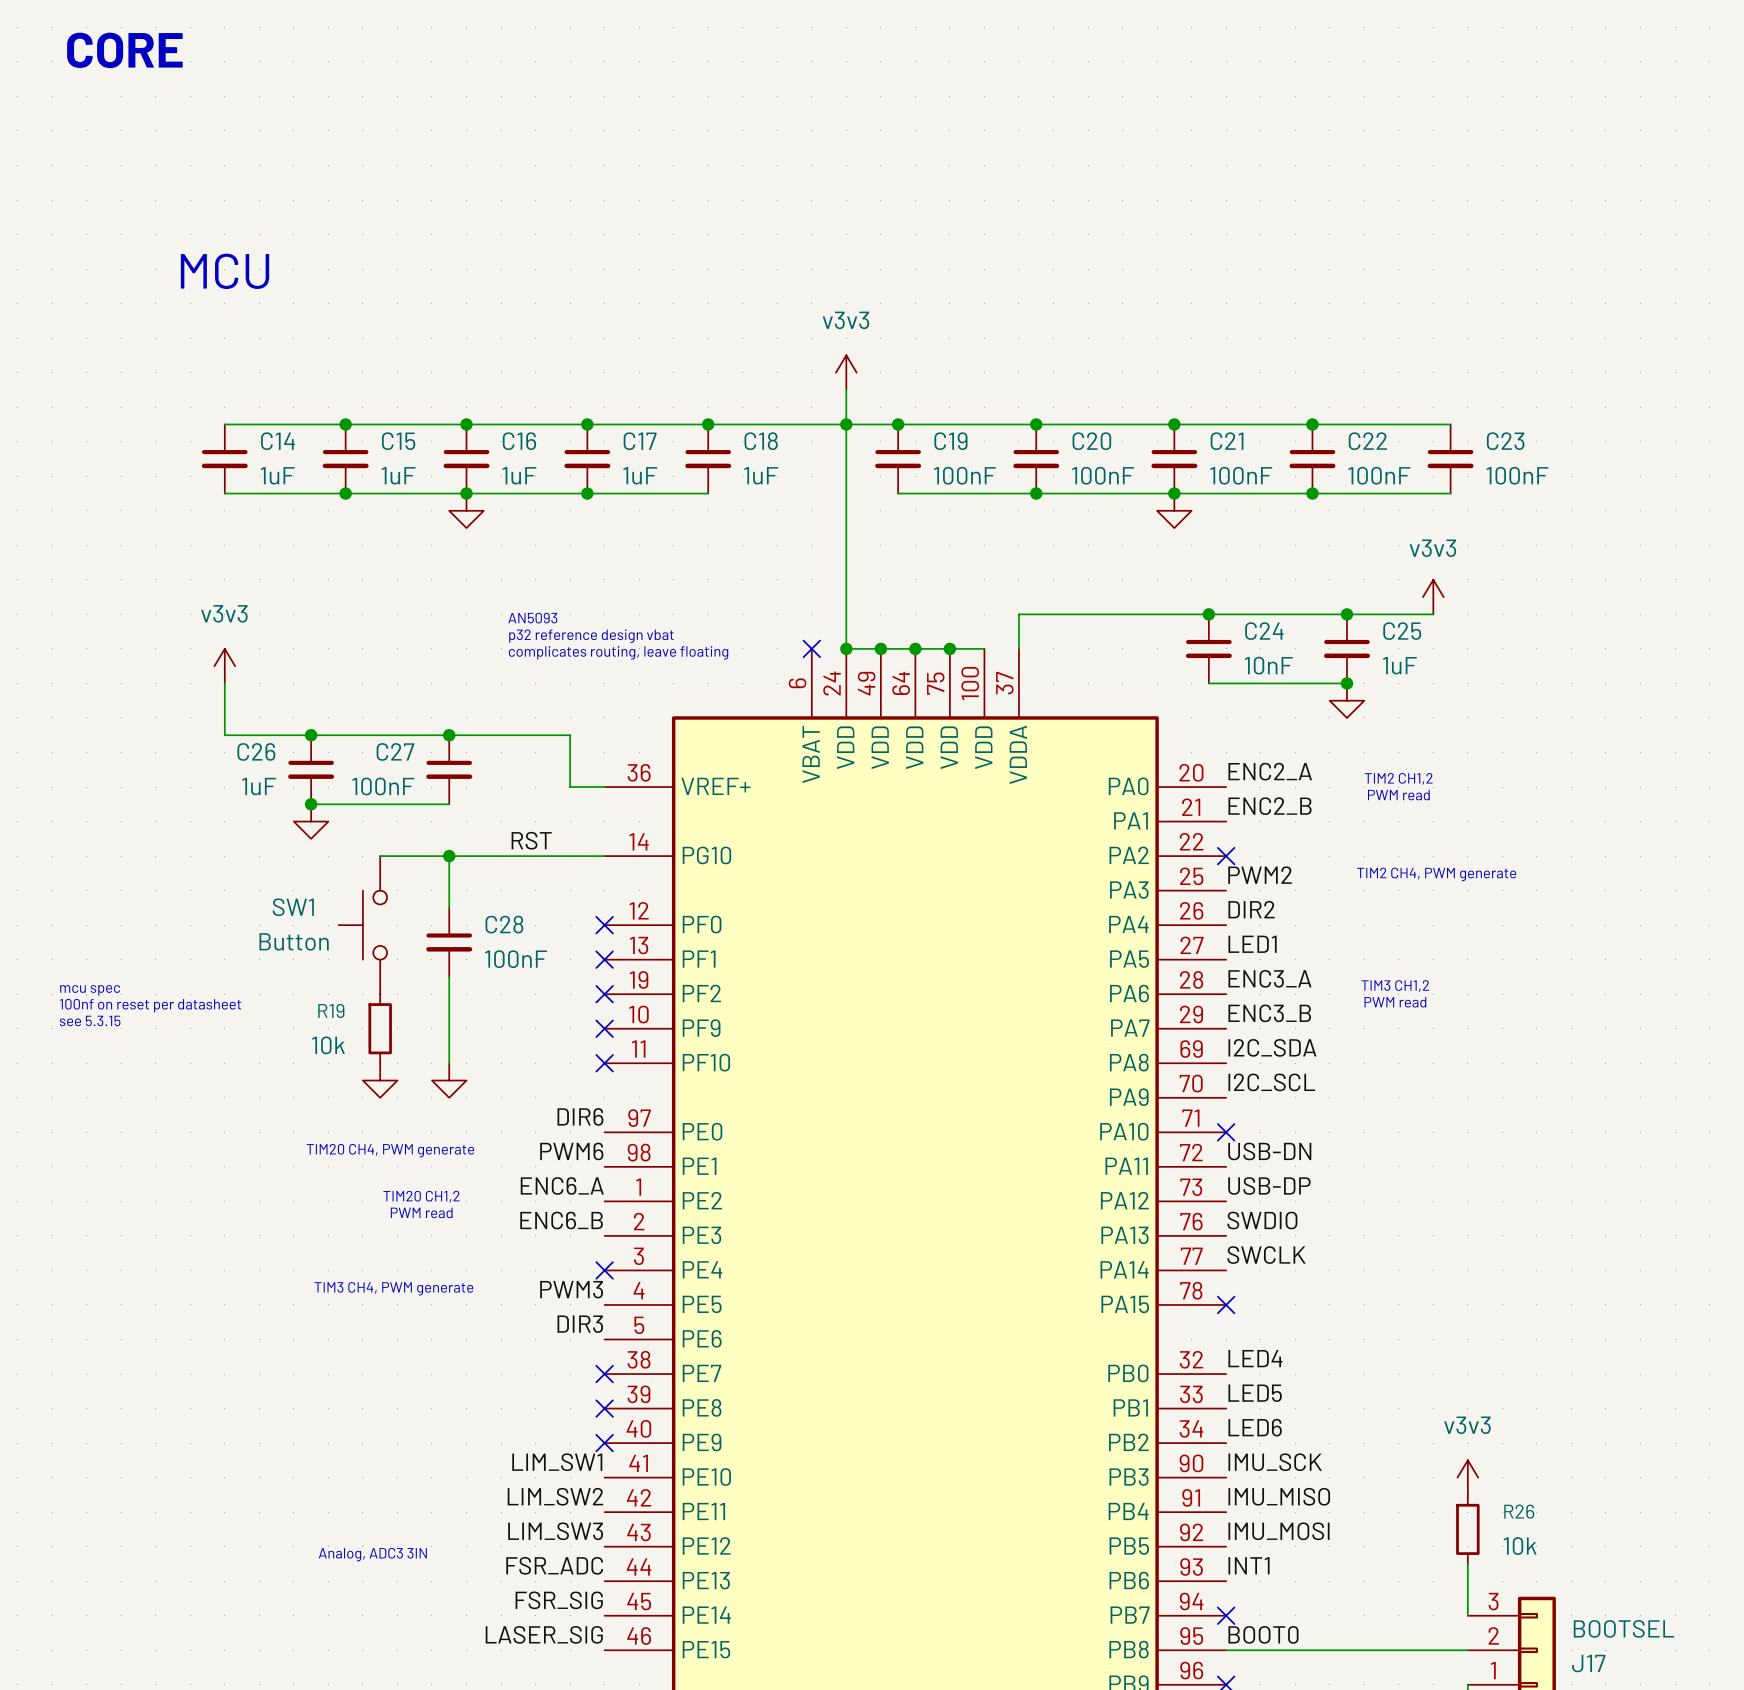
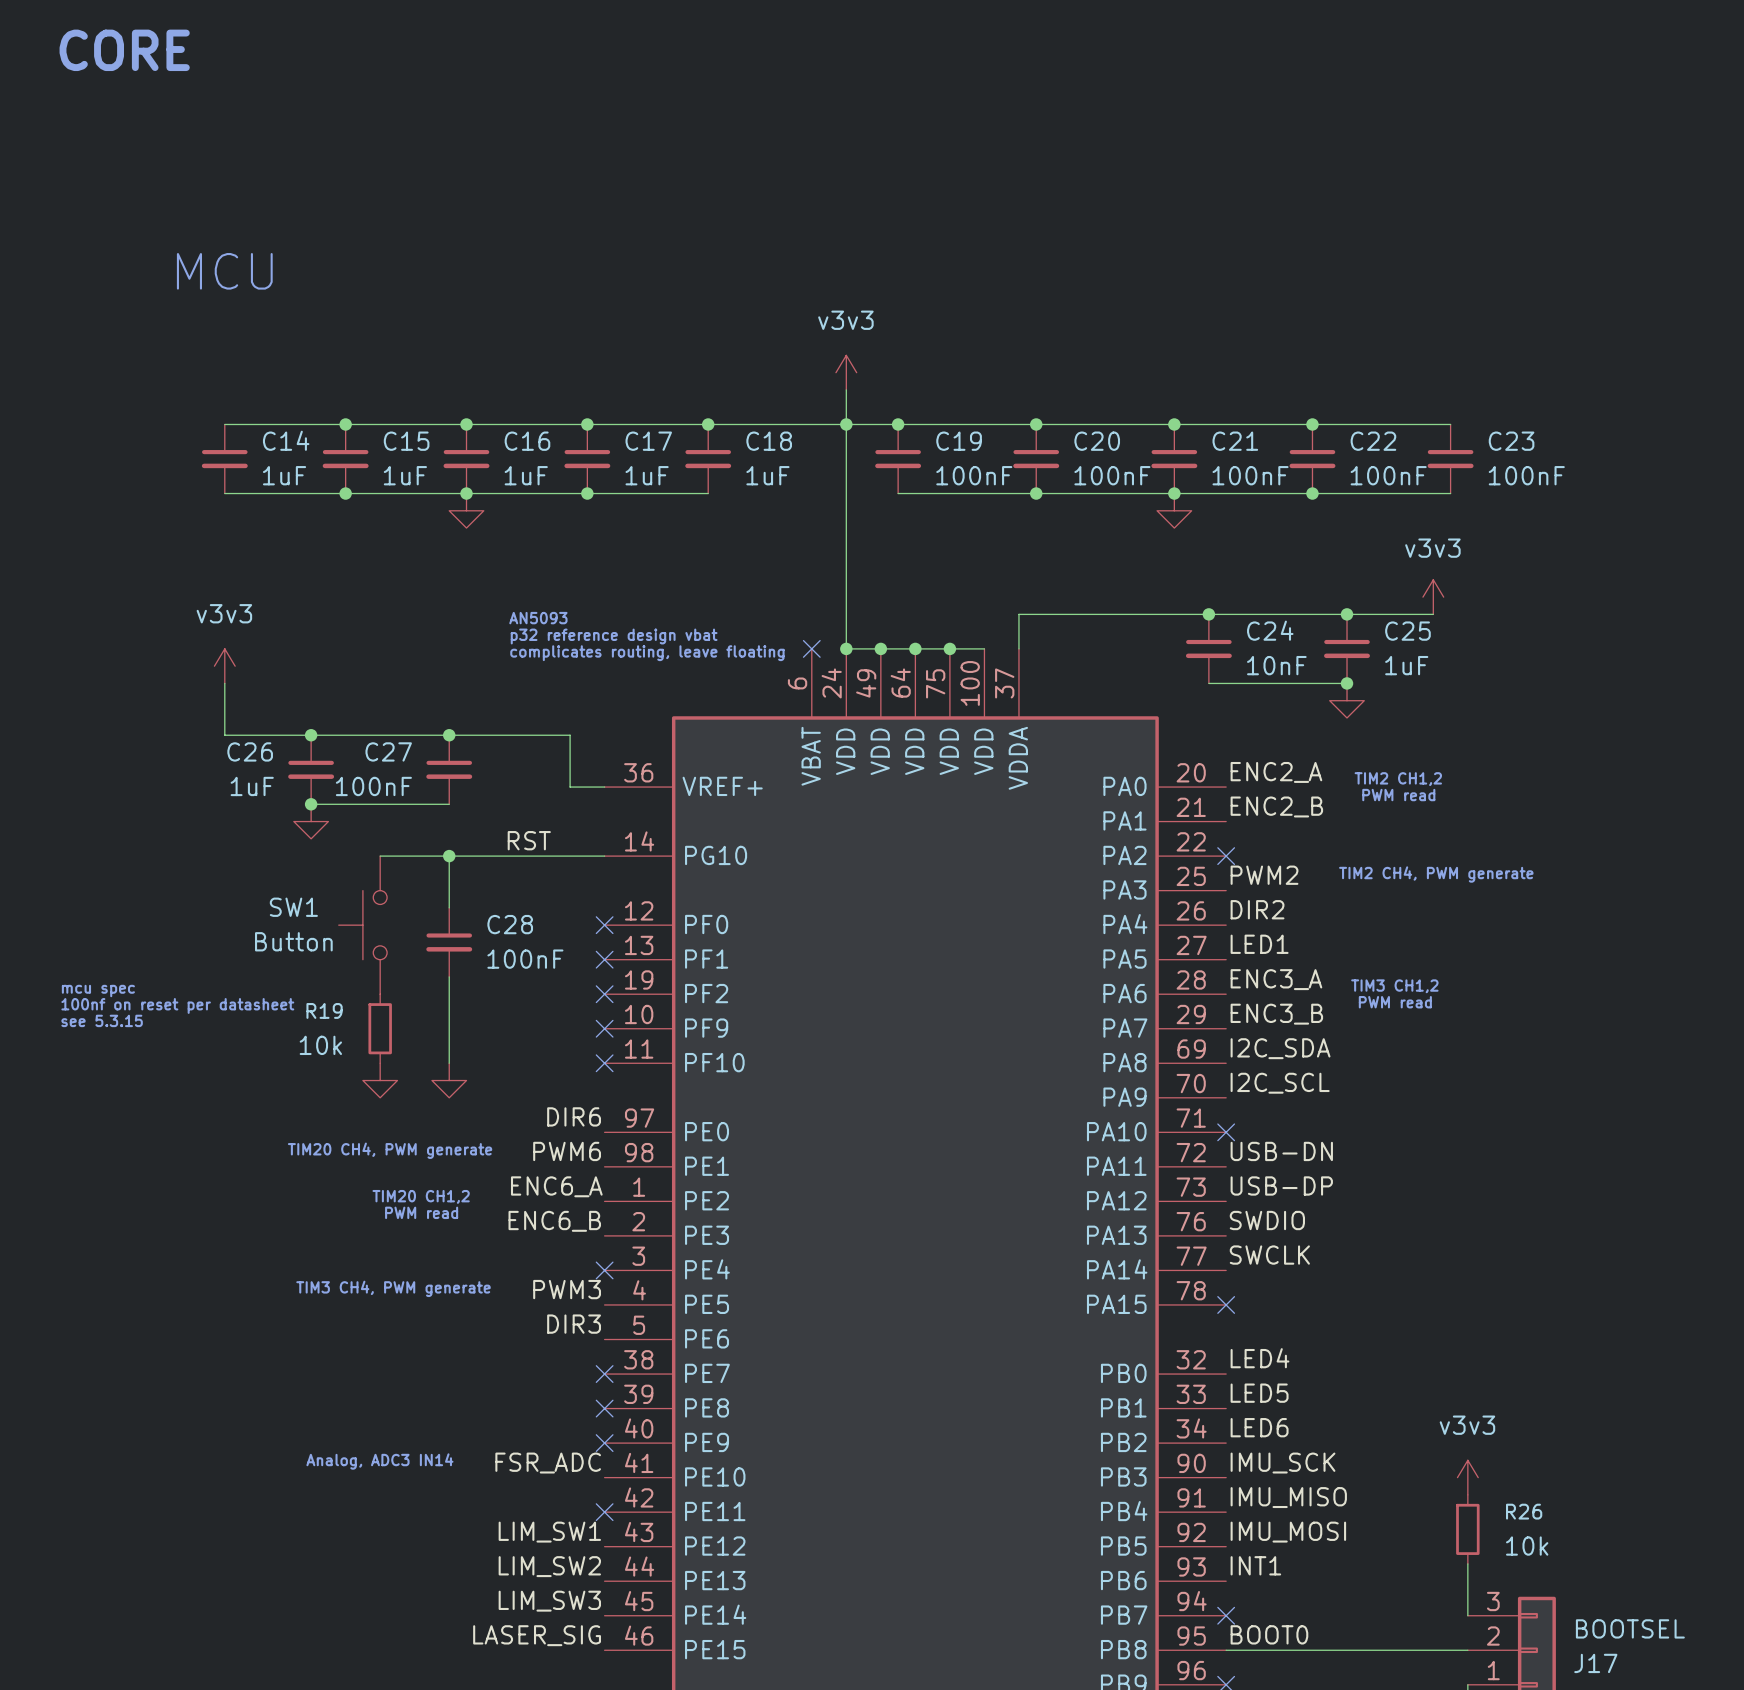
text: none -> Analog, ADC3 IN14 (379, 1461)
label: LIM_SW1 (557, 1462) -> FSR_ADC (548, 1463)
label: LIM_SW2 (555, 1496) -> none
no-connect mark: none -> (604, 1512)
label: LIM_SW3 (555, 1531) -> LIM_SW1 (549, 1532)
text: Analog, ADC3 3IN (372, 1554) -> none
label: FSR_ADC (554, 1565) -> LIM_SW2 (549, 1566)
label: FSR_SIG (559, 1600) -> LIM_SW3 (549, 1601)

